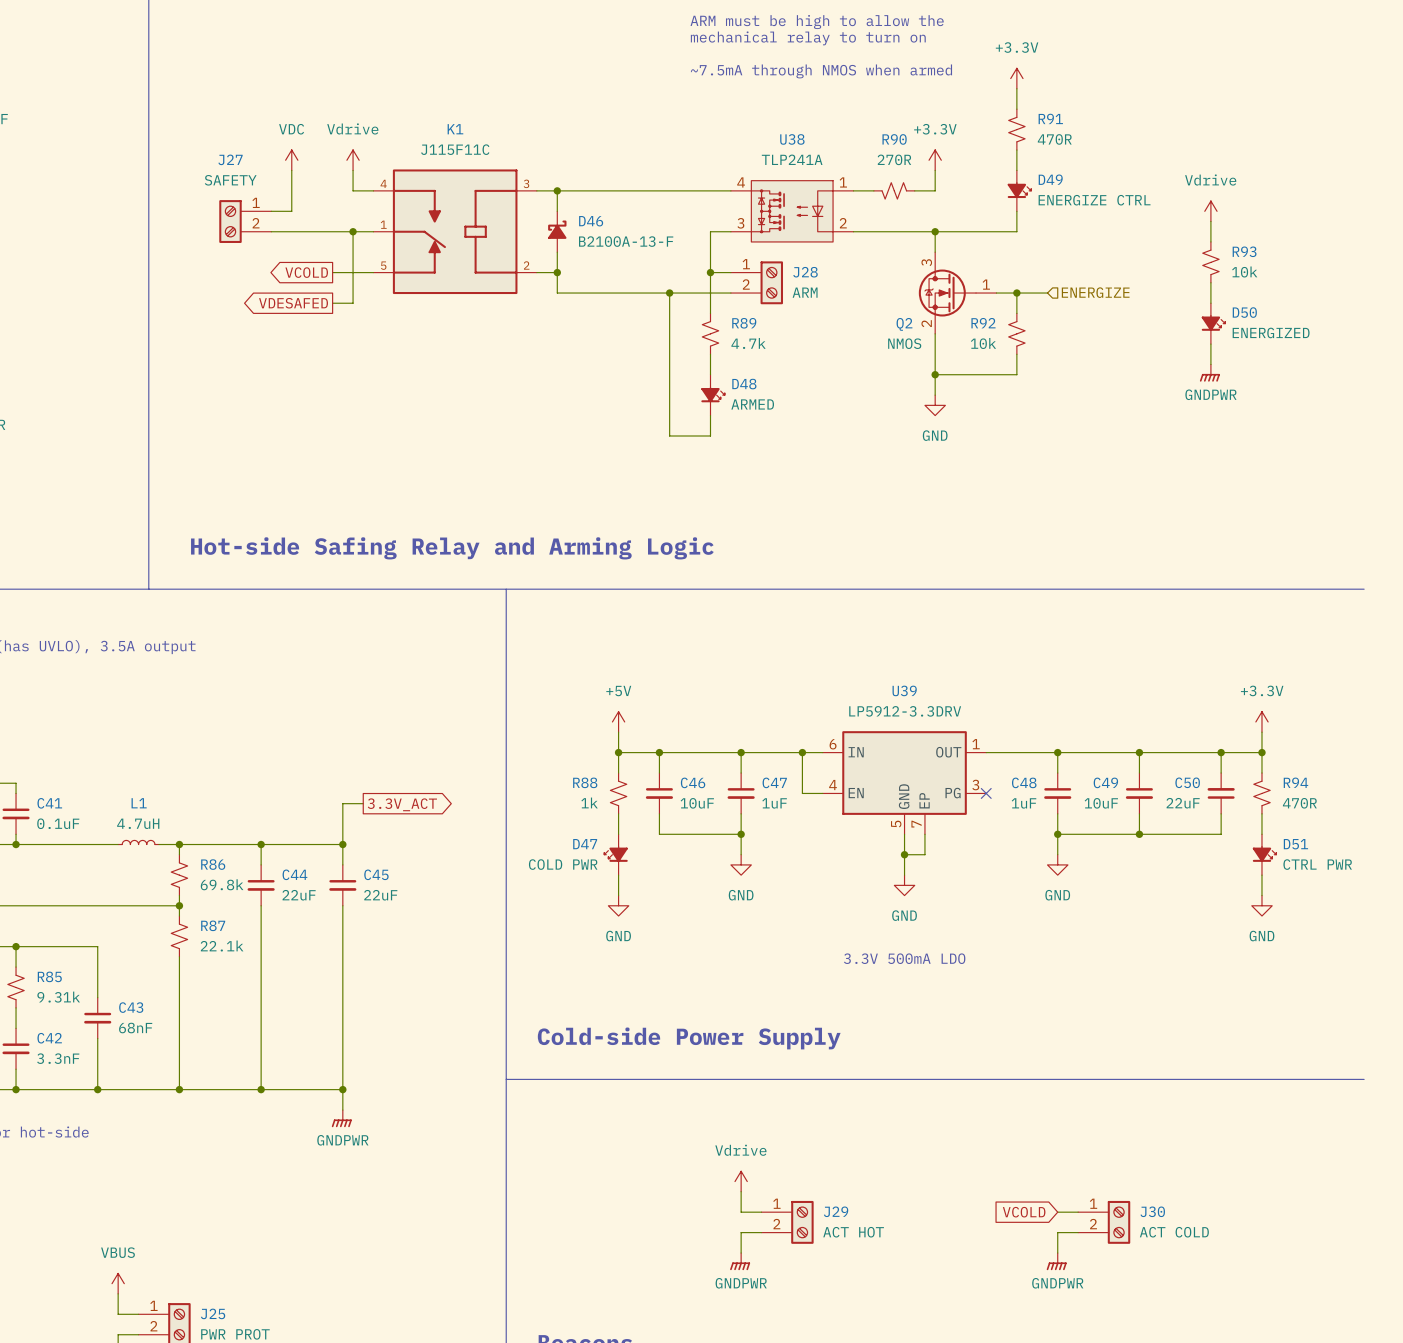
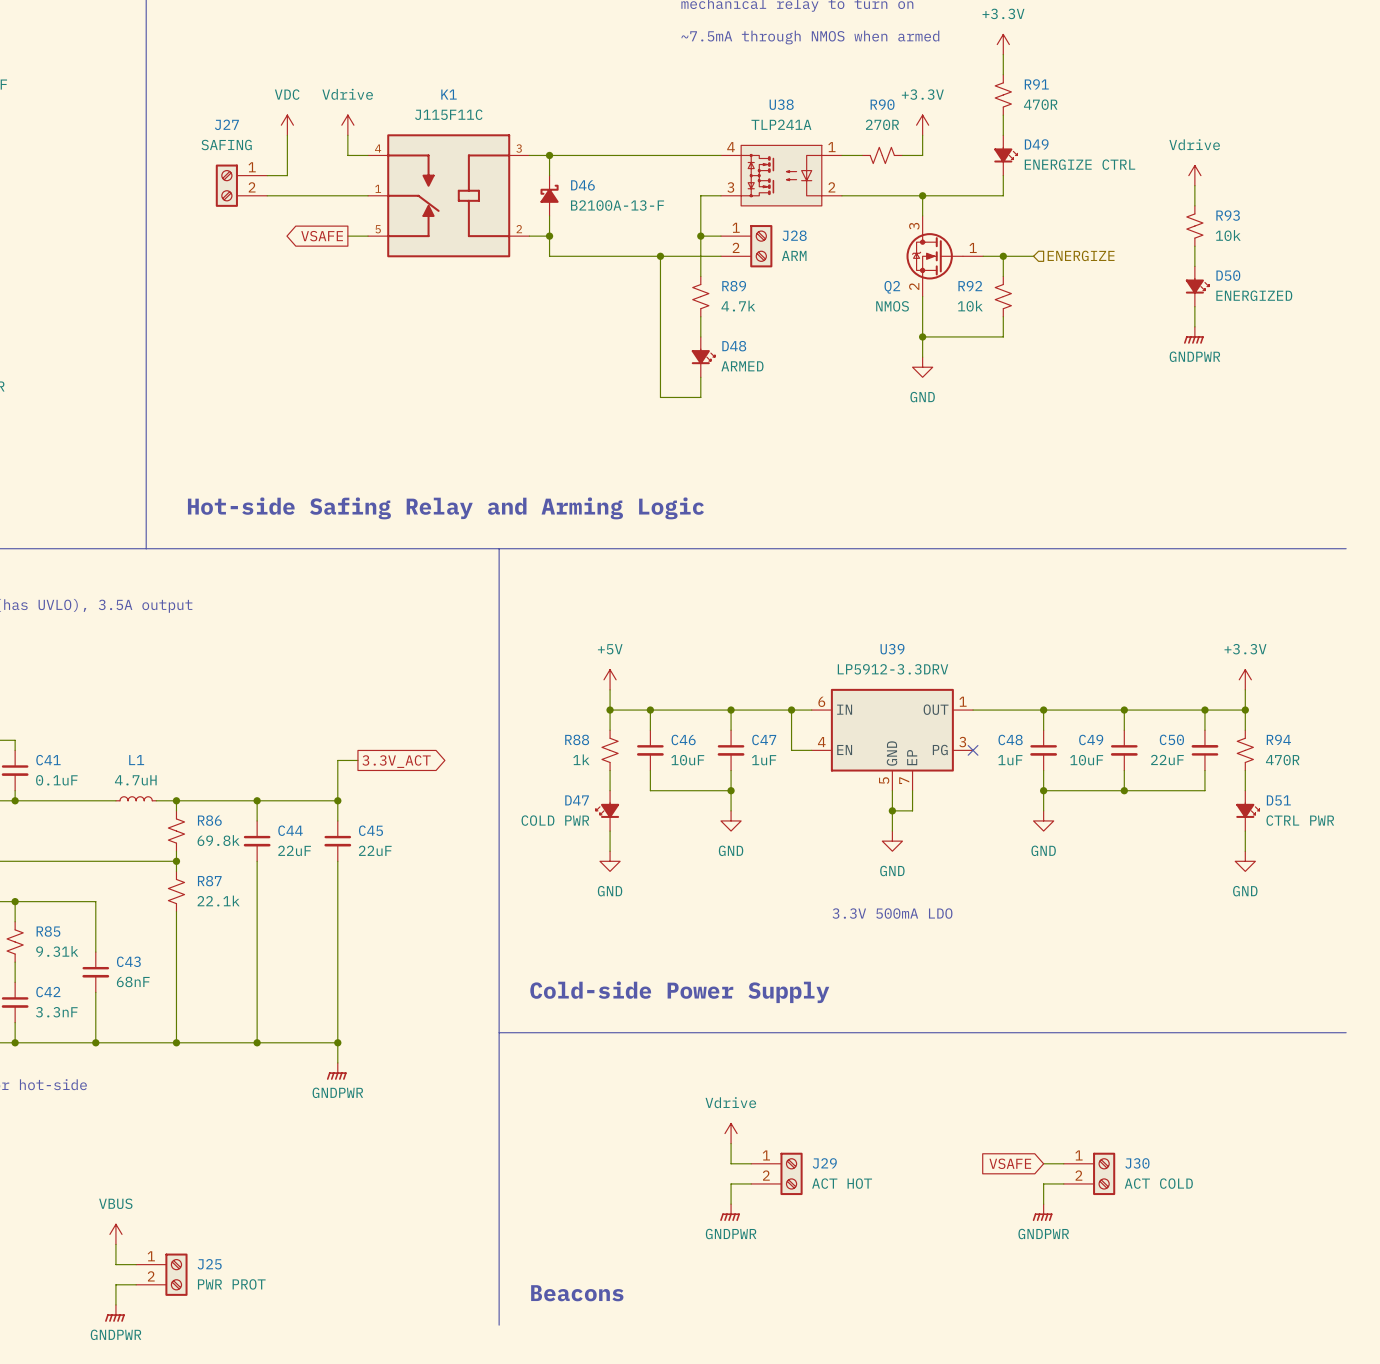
J27 value: SAFETY (230, 180) -> SAFING (226, 145)
wire: (353, 231) (353, 303) (332, 303) -> none
junction: (353, 231) -> none
global label: VCOLD (306, 272) -> none
global label: none -> VSAFE (322, 236)
global label: VDESAFED (293, 303) -> none
global label: VCOLD (1024, 1212) -> VSAFE (1010, 1163)

